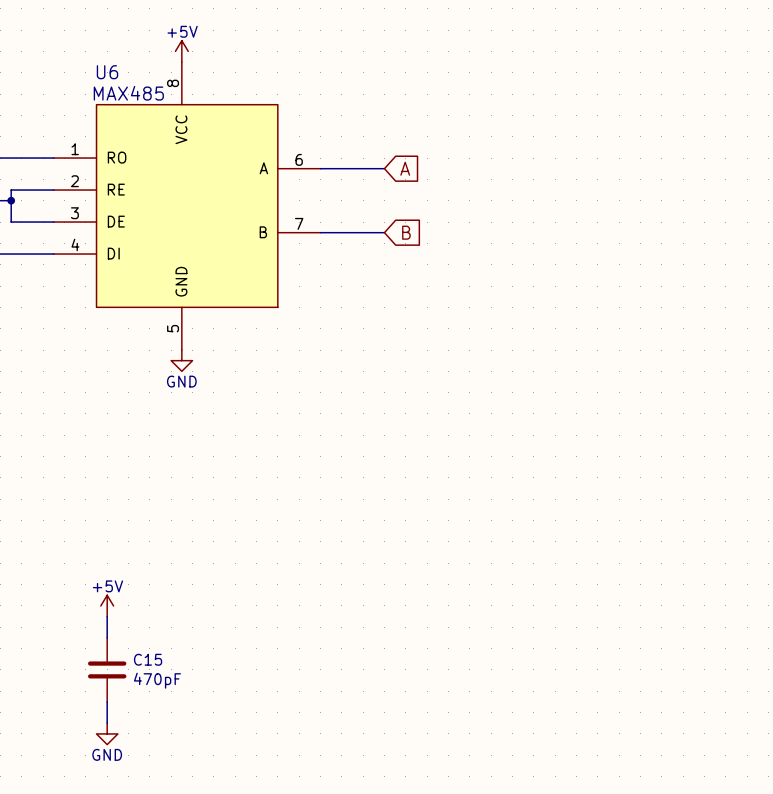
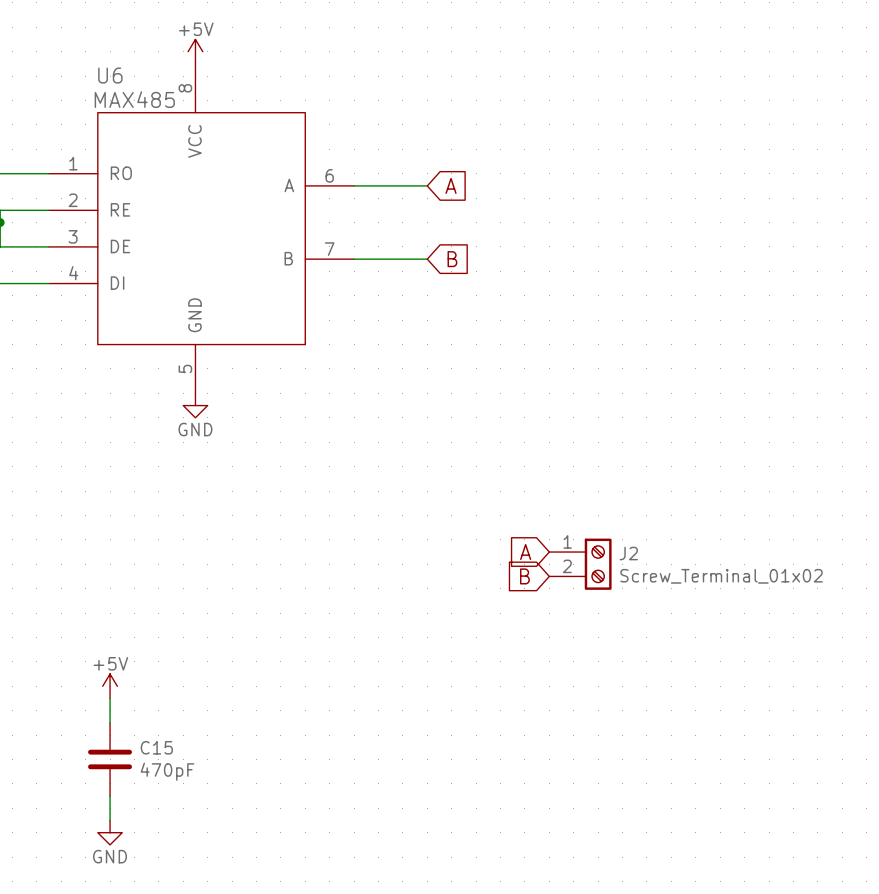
global label: none -> A (525, 552)
J2: none -> Screw_Terminal_01x02 (580, 564)
global label: none -> B (524, 576)

